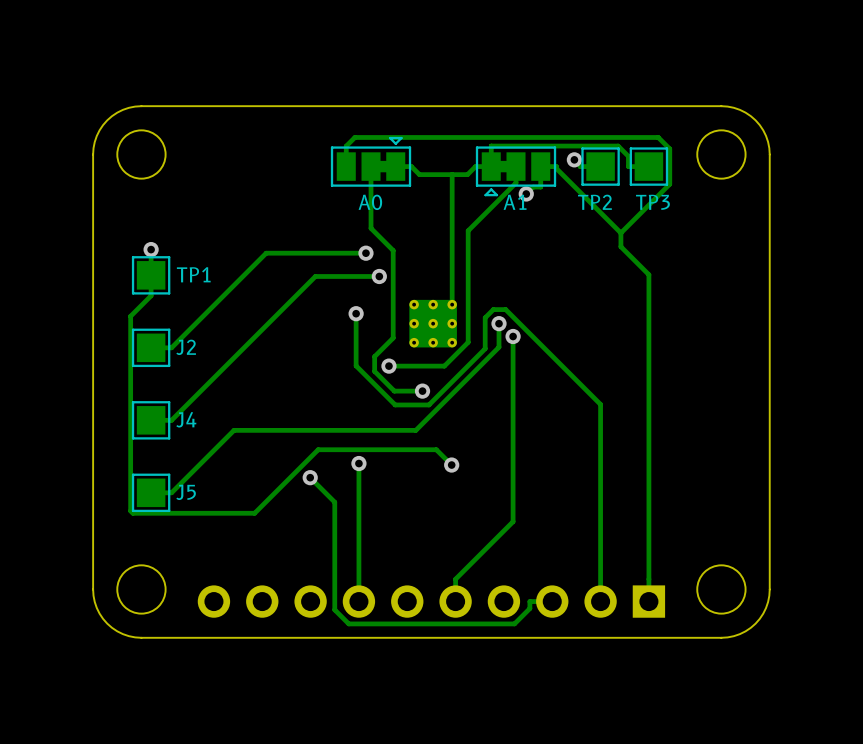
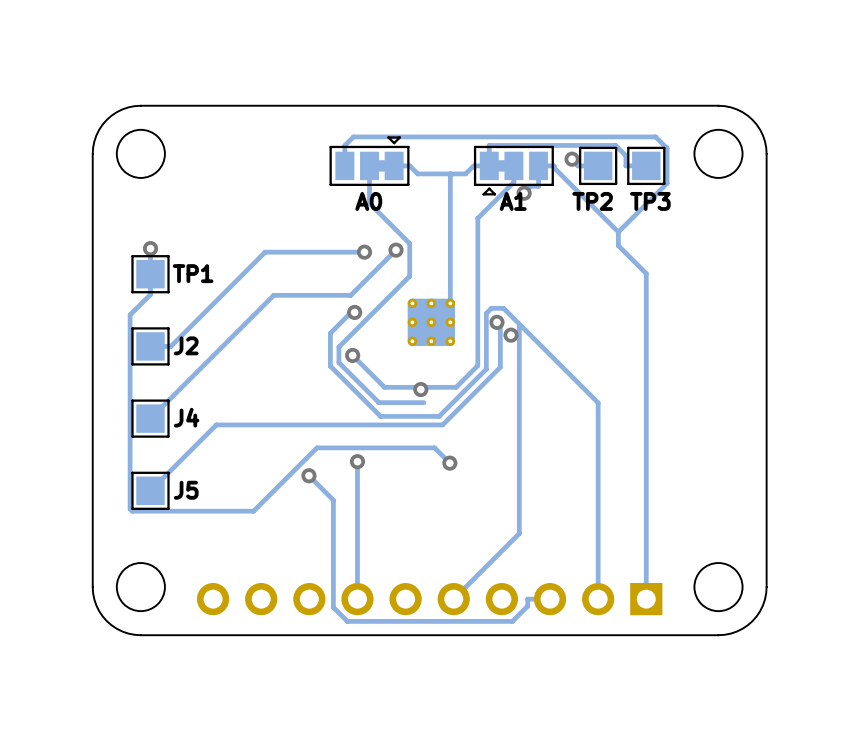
track: (371, 204) (371, 228) (393, 250) (393, 338) (374, 356) (374, 371) (394, 391) (422, 391) -> (369, 203) (409, 243) (409, 276) (338, 347) (338, 362) (378, 402) (423, 402)
track: (479, 219) (468, 230) (468, 342) (444, 366) (388, 366) -> (477, 218) (477, 365) (456, 387) (384, 387) (352, 355)
track: (379, 276) (315, 276) (171, 420) (151, 420) -> (395, 250) (350, 295) (273, 295) (150, 418)
via position: (379, 276) -> (395, 250)
track: (356, 313) (356, 365) (395, 404) (428, 404) (485, 348) (485, 317) (488, 314) -> (352, 310) (330, 333) (330, 366) (380, 416) (439, 416) (486, 369) (486, 313)
track: (499, 323) (499, 347) (415, 430) (234, 430) (171, 492) (151, 492) -> (500, 326) (500, 367) (442, 424) (216, 424) (150, 490)
track: (513, 336) (513, 521) (455, 579) (455, 601) -> (519, 326) (519, 533) (453, 599)
via position: (388, 366) -> (352, 355)

